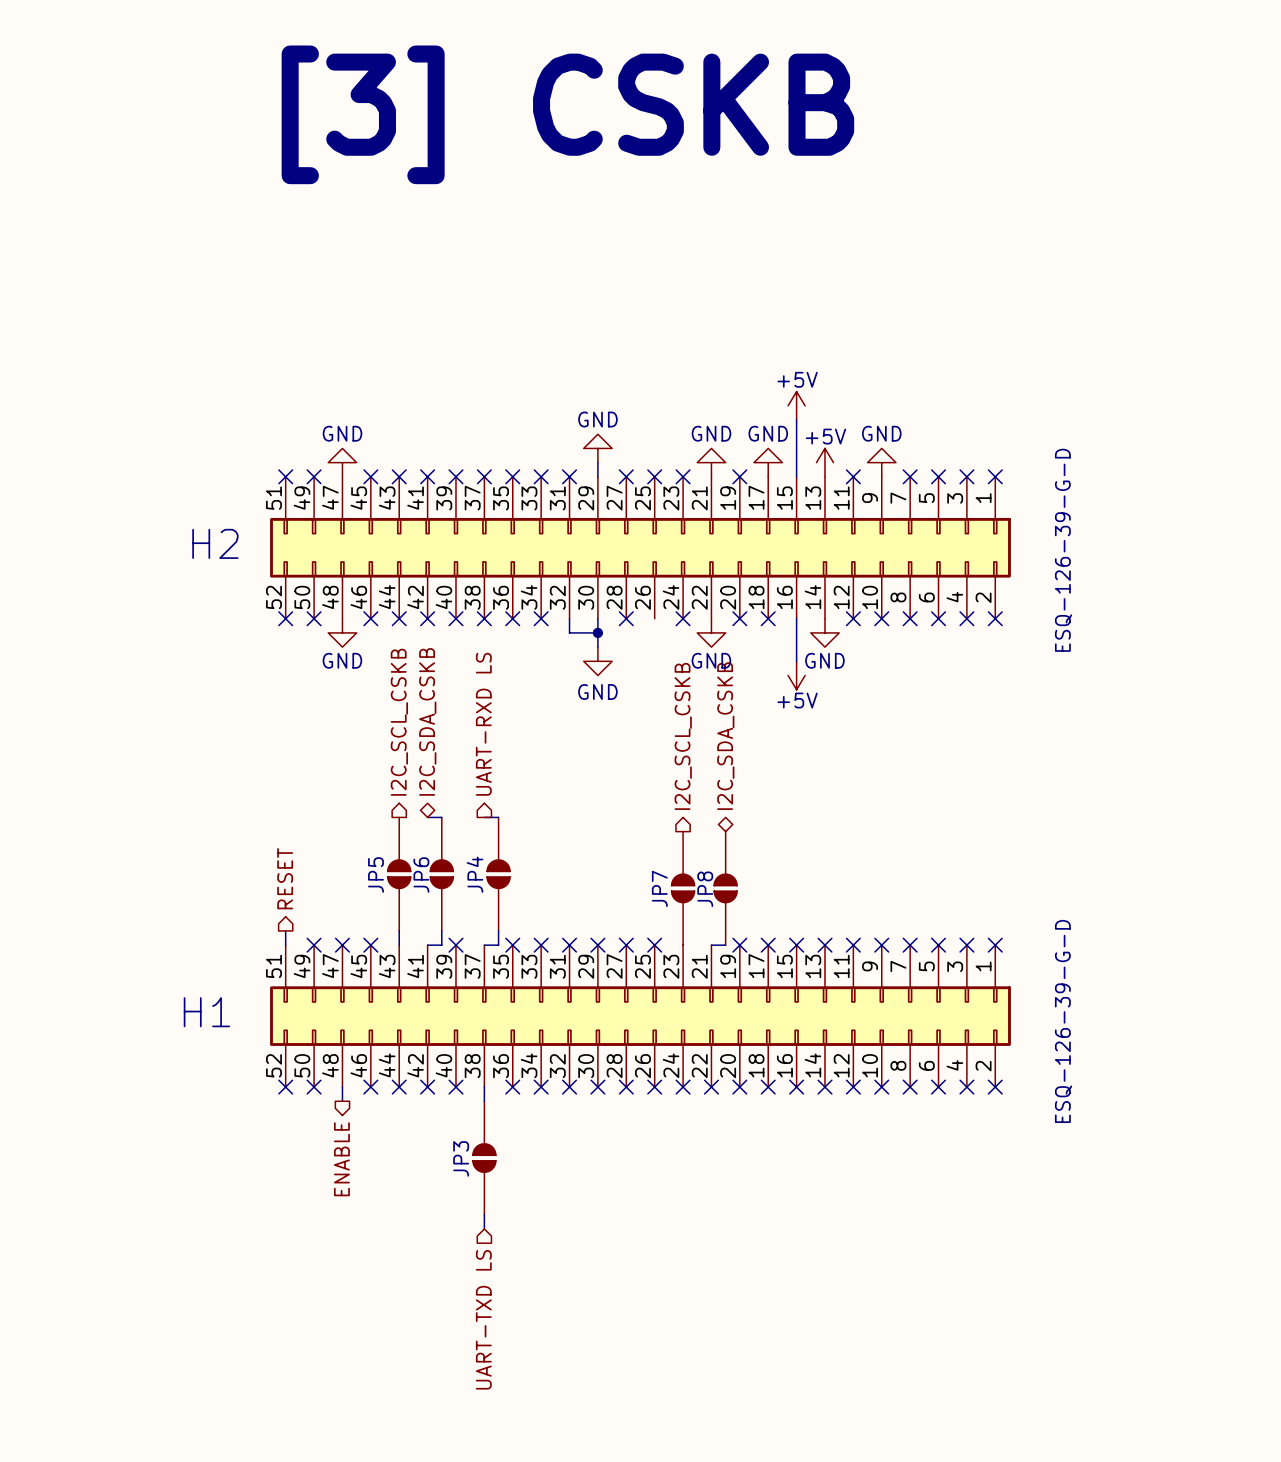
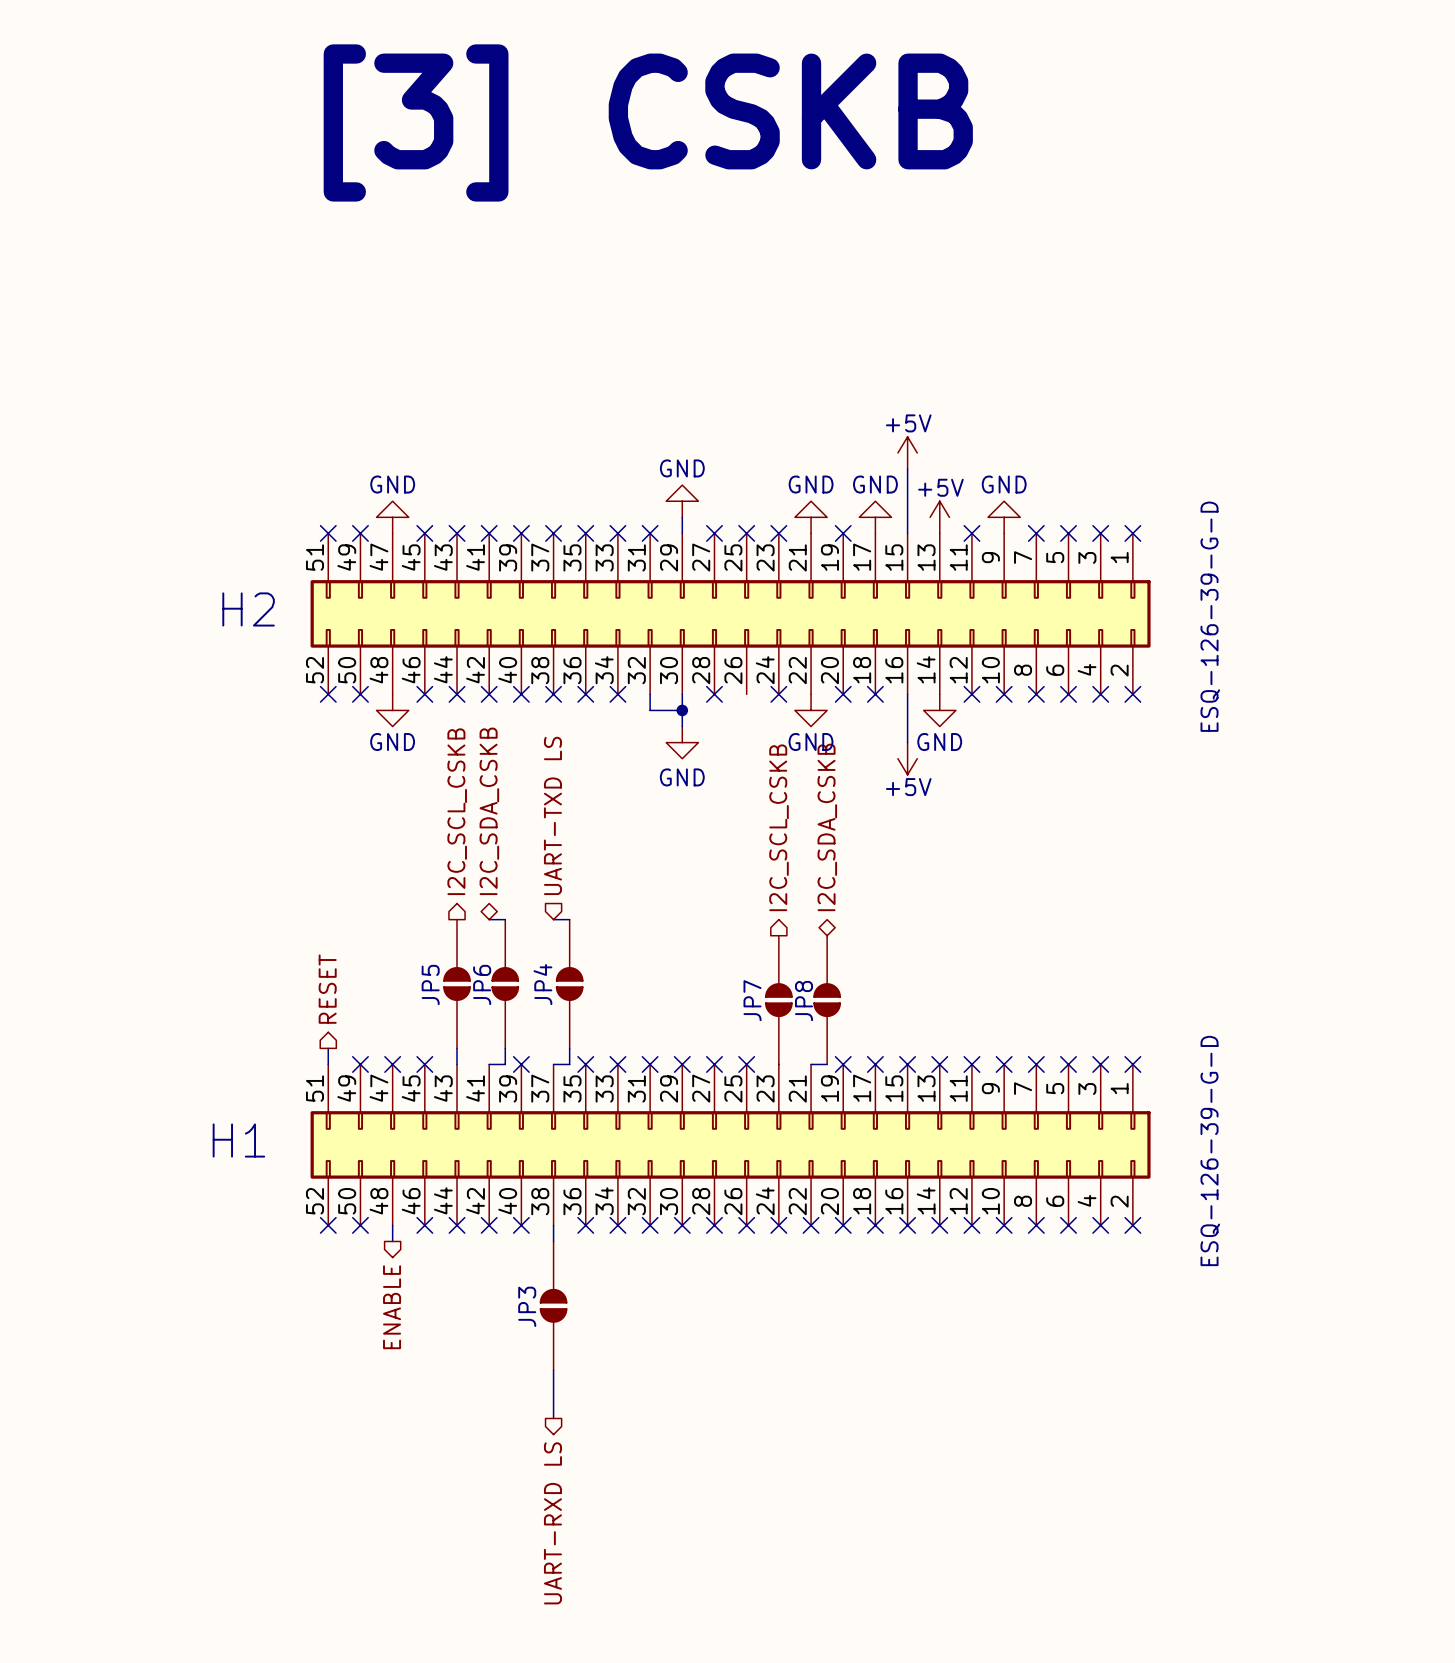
hierarchical label shape: output (483, 724) -> input (552, 815)
hierarchical label: UART-RXD LS (483, 724) -> UART-TXD LS (552, 815)
wire: none -> (553, 1386) (553, 1418)
hierarchical label shape: input (483, 1319) -> output (552, 1523)
hierarchical label: UART-TXD LS (483, 1319) -> UART-RXD LS (552, 1523)

